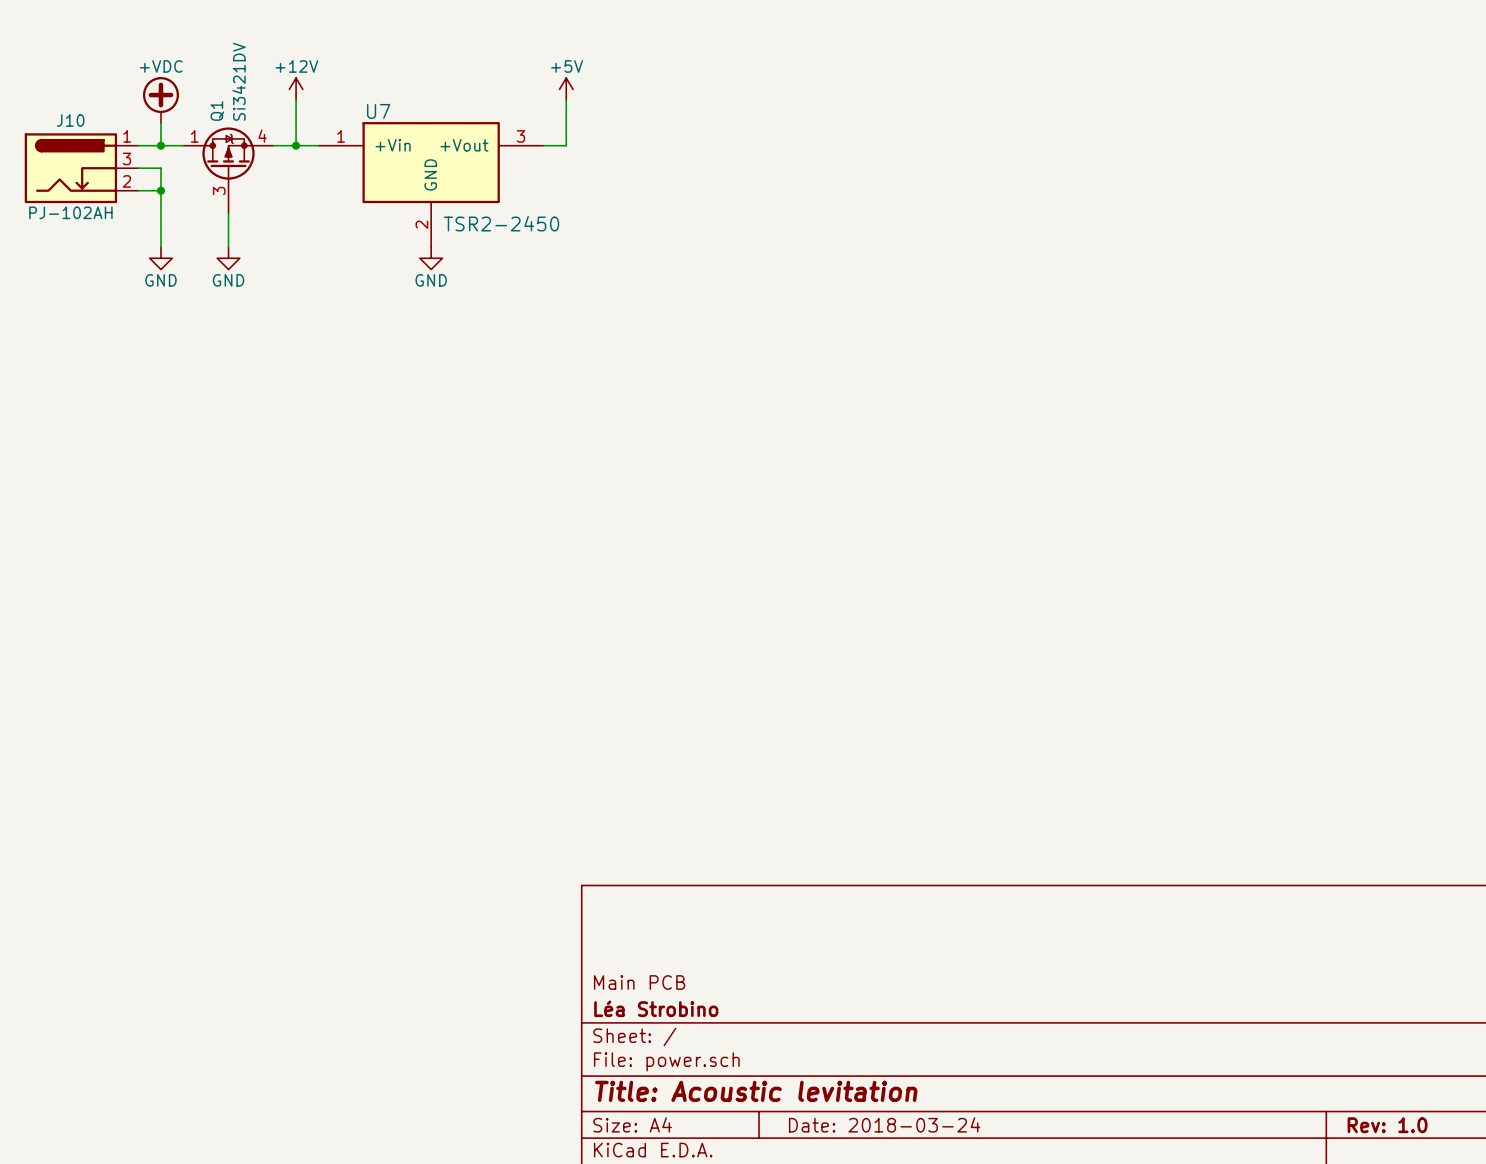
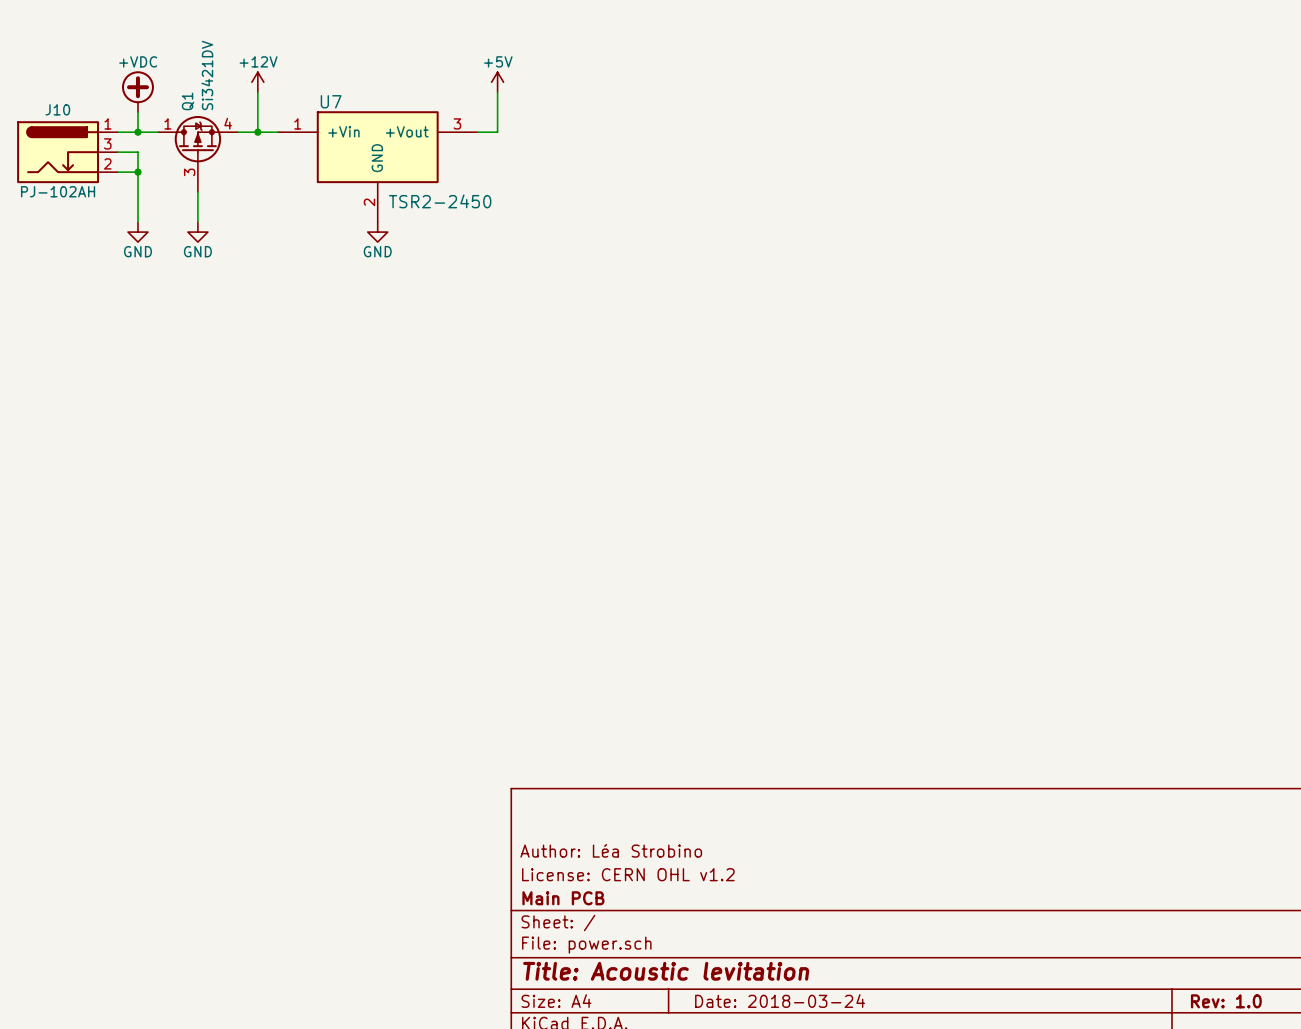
title block: none -> Author: Léa Strobino (611, 850)
title block: Main PCB (639, 982) -> License: CERN OHL v1.2 (628, 874)
title block: Léa Strobino (656, 1008) -> Main PCB (563, 898)

